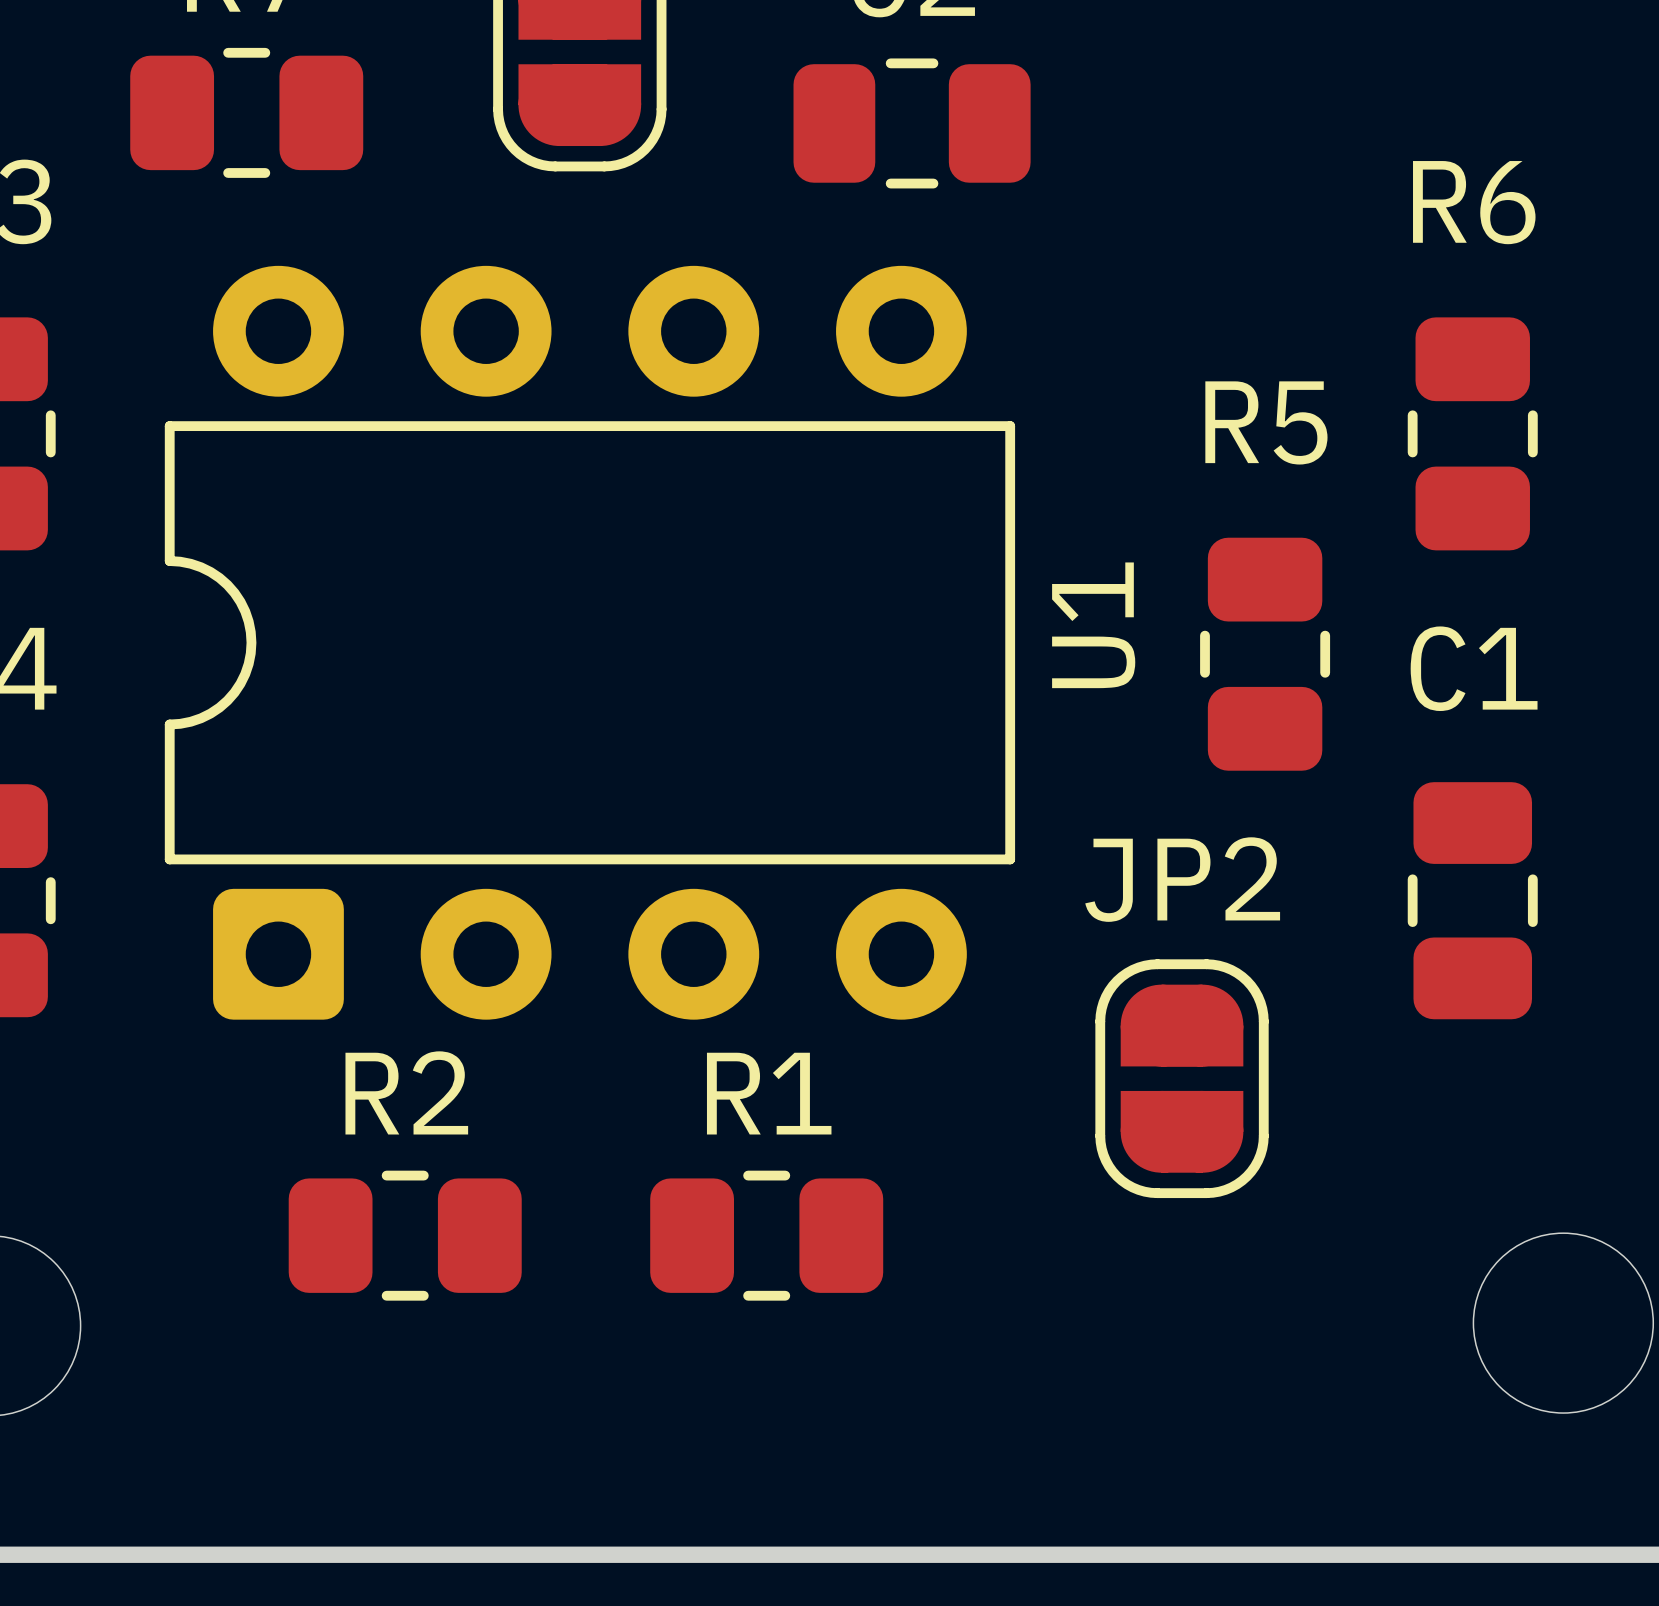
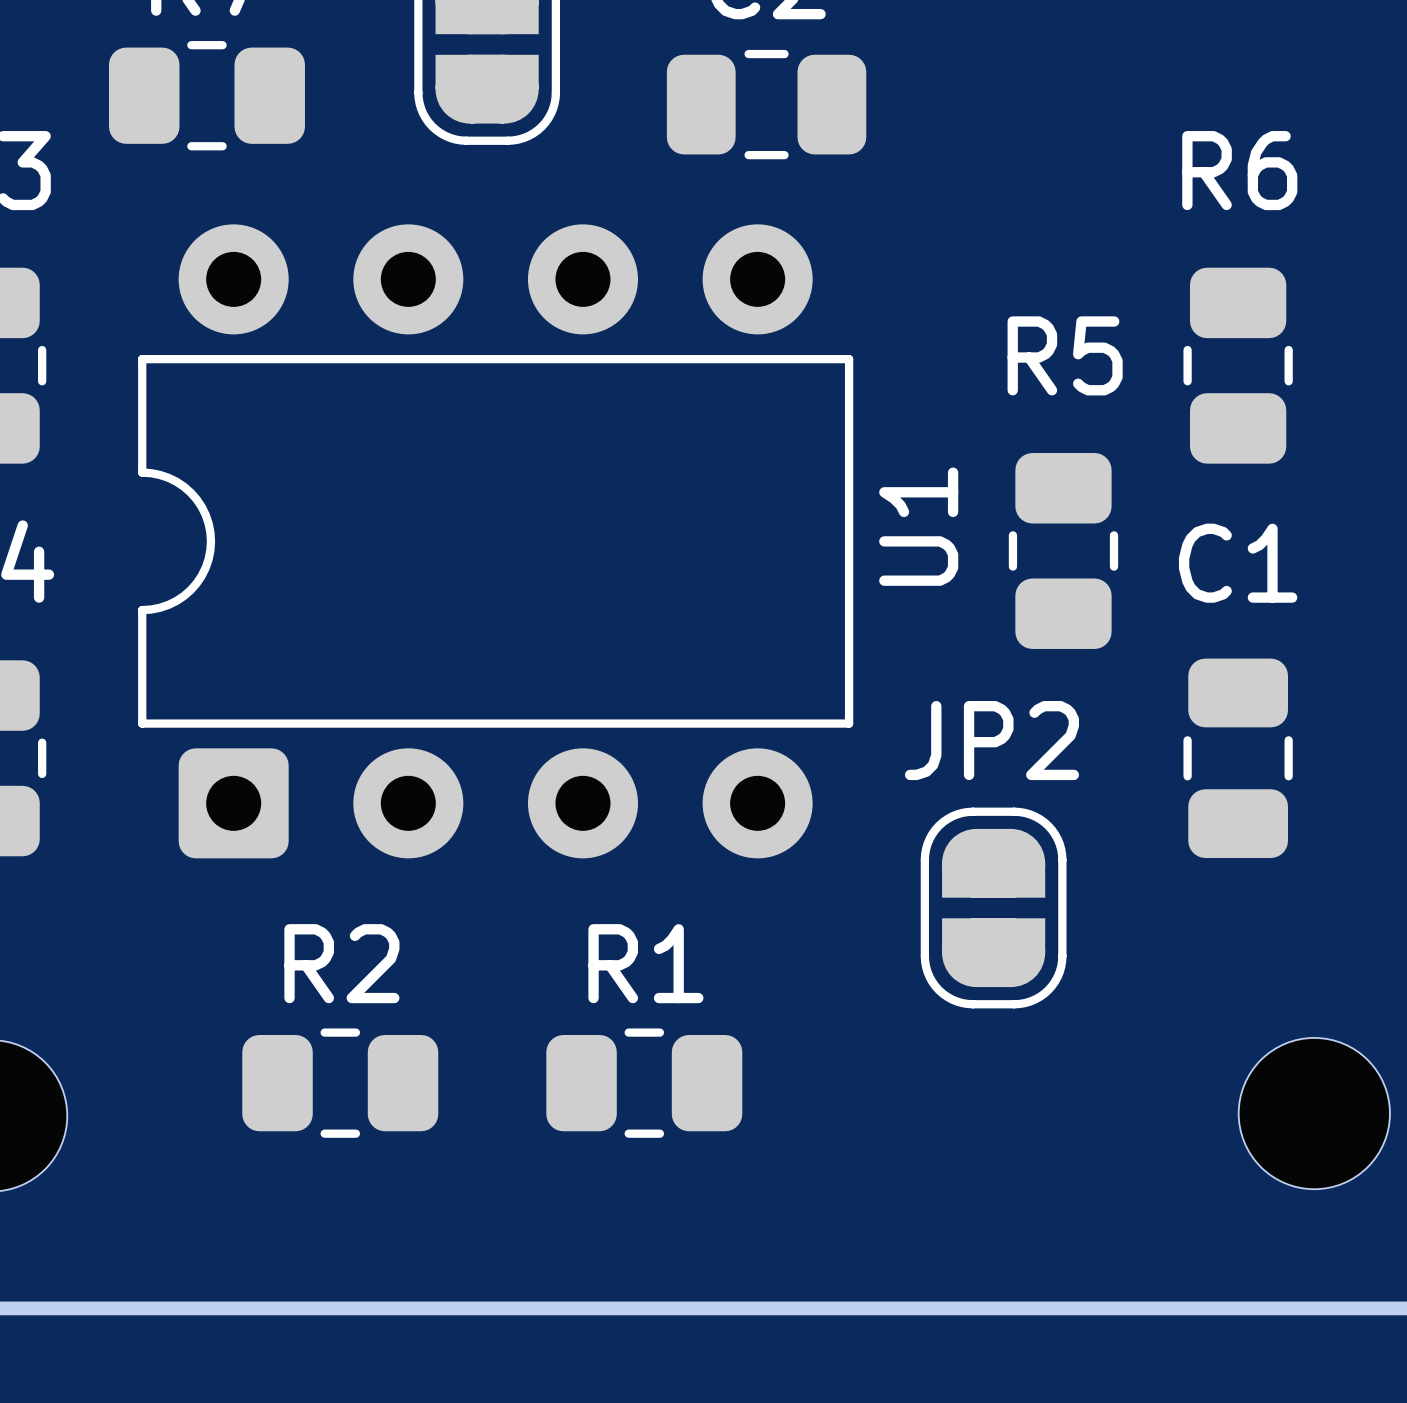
R2 position: (405, 1235) -> (340, 1083)
R1 position: (766, 1235) -> (644, 1083)

